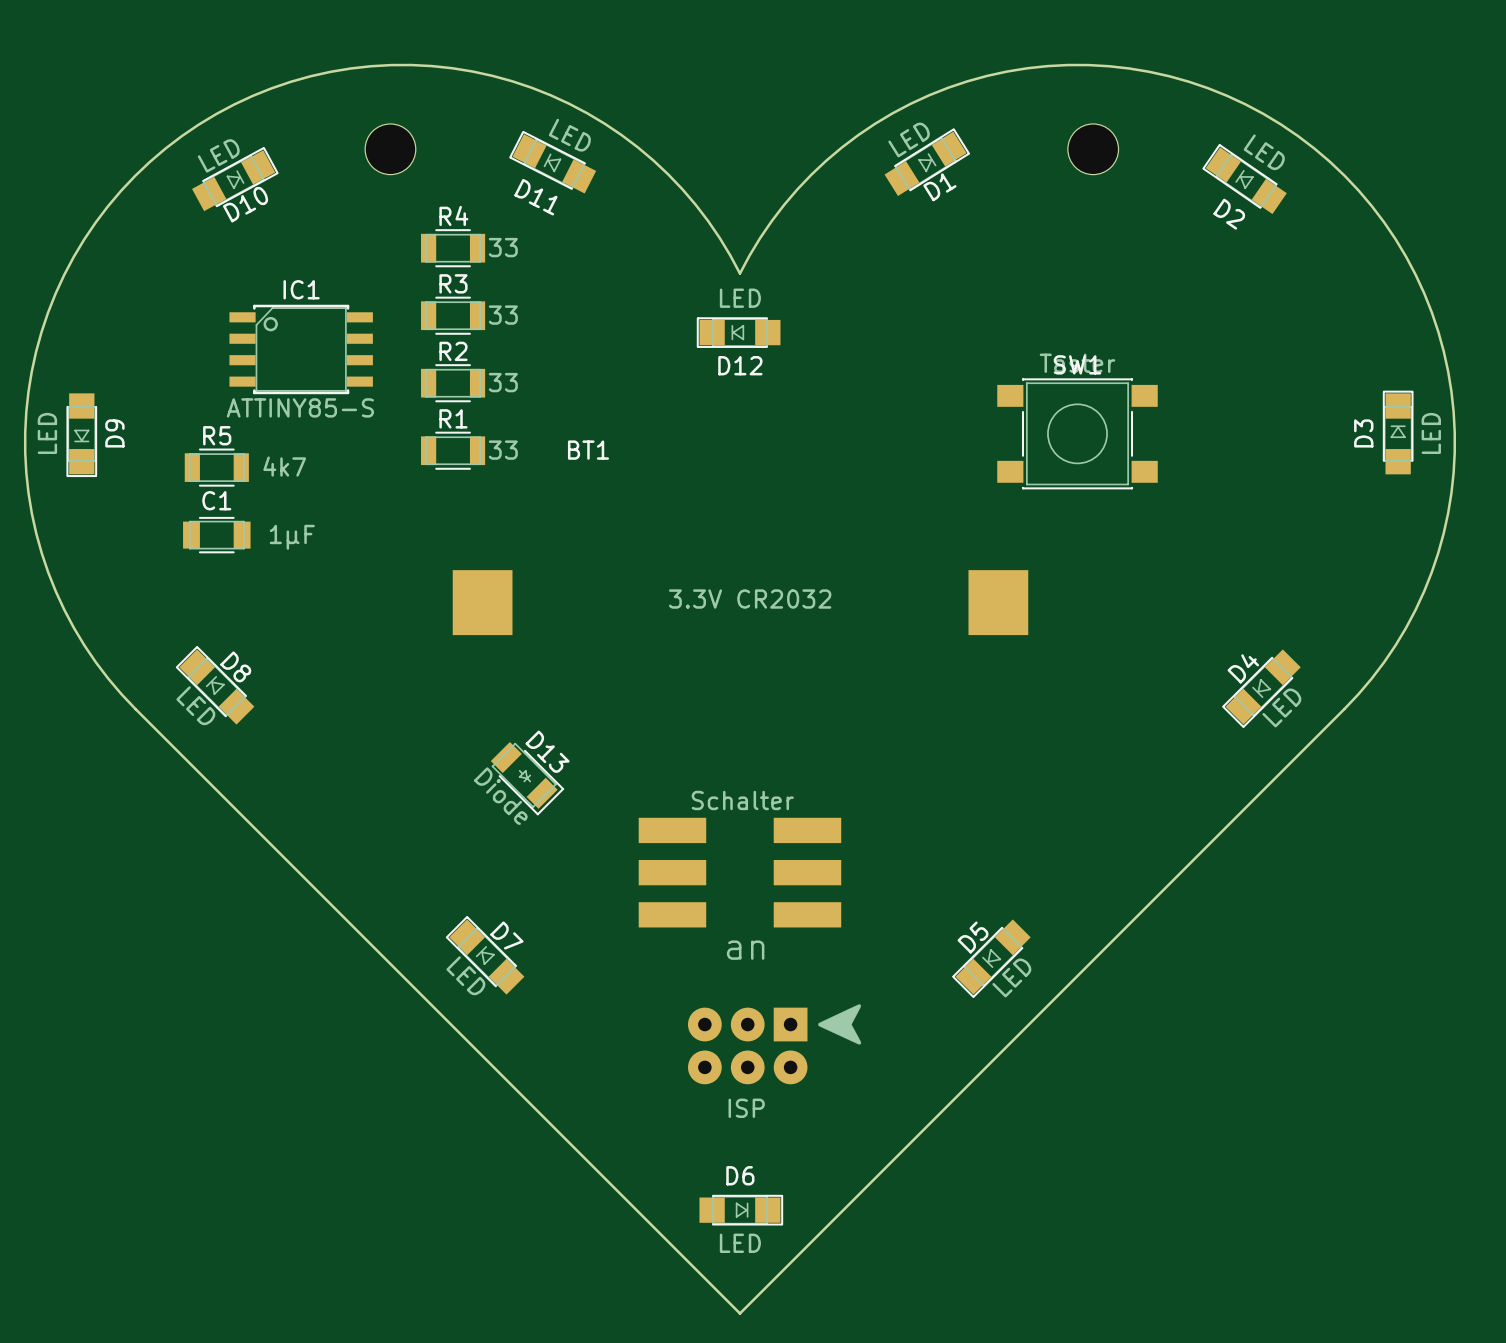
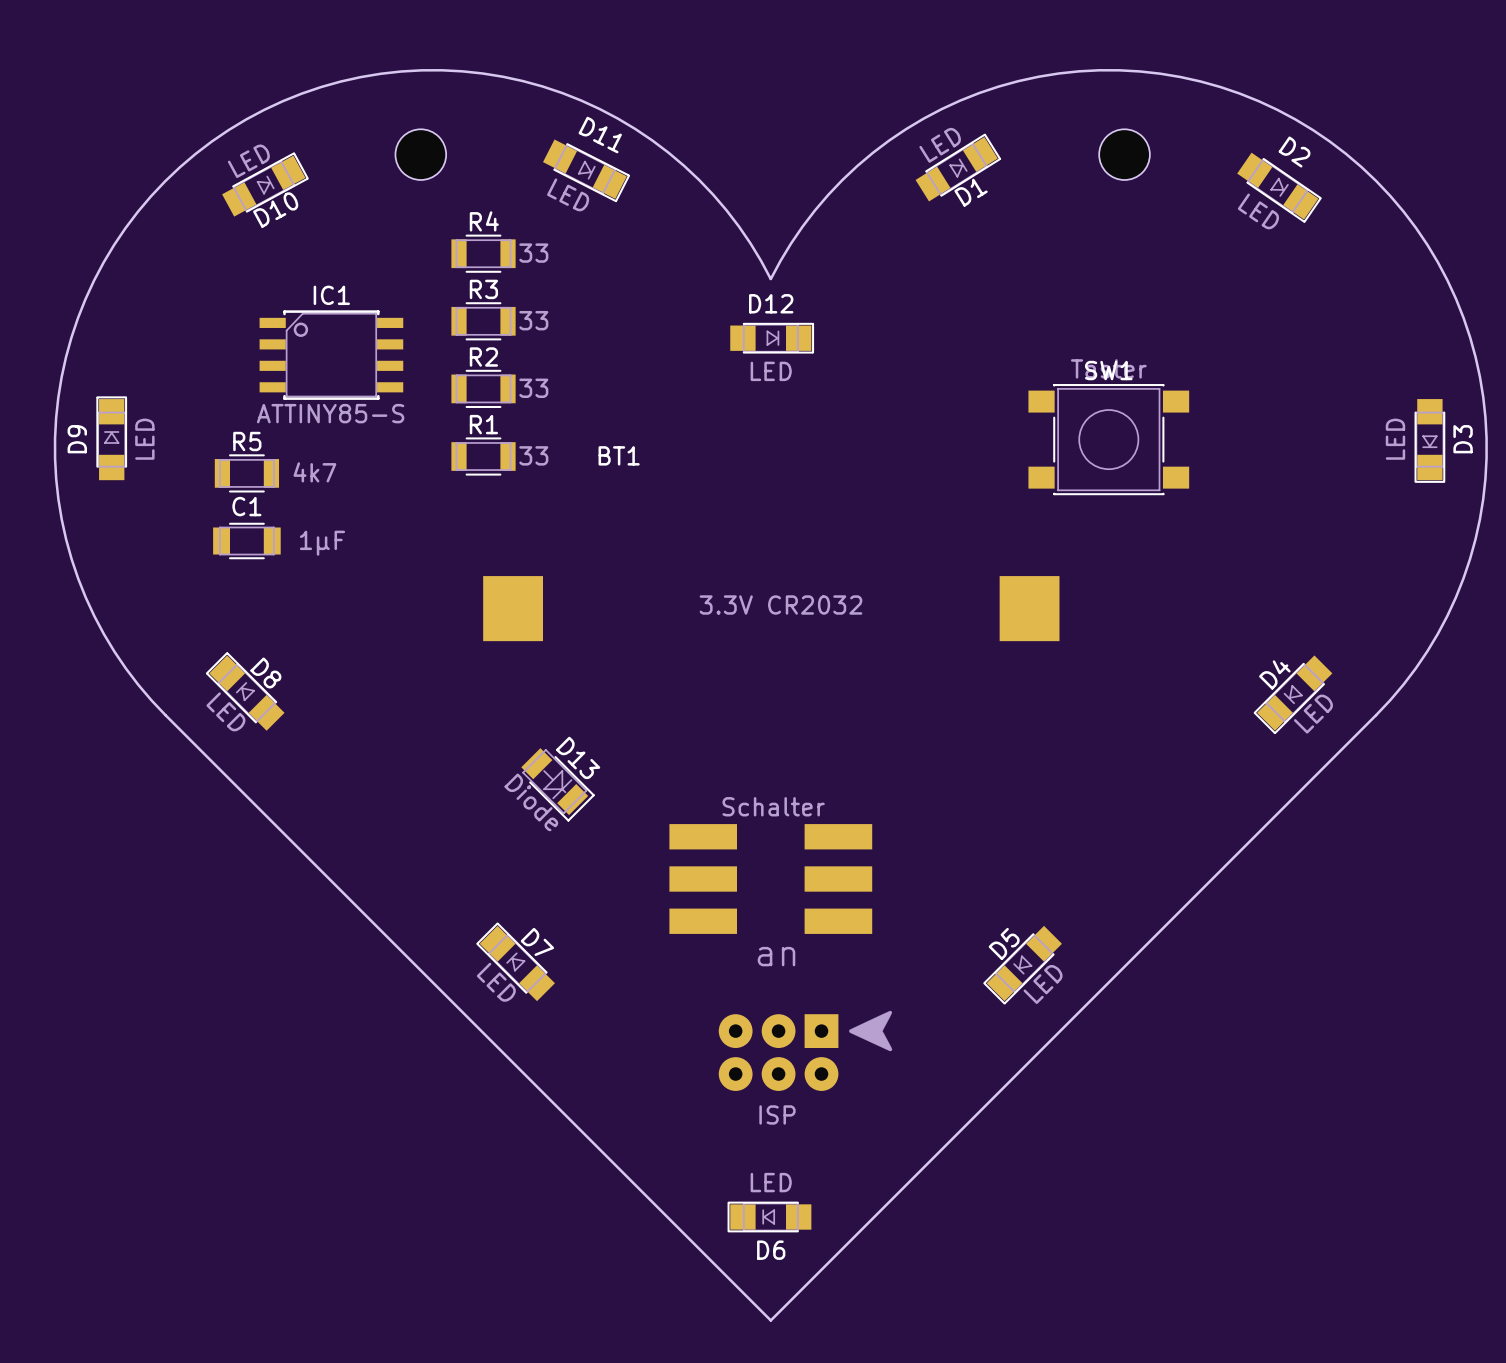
D11 rotation: 0° (552, 162) -> 180° (586, 170)
D2 rotation: 0° (1244, 179) -> 180° (1279, 187)
D12 rotation: 0° (738, 332) -> 180° (772, 338)
D3 rotation: 0° (1398, 432) -> 180° (1429, 440)
D9 rotation: 0° (81, 435) -> 180° (111, 438)
part footprint: [490, 741, 565, 816] -> [521, 748, 595, 822]
D6 rotation: 0° (741, 1210) -> 180° (769, 1217)

